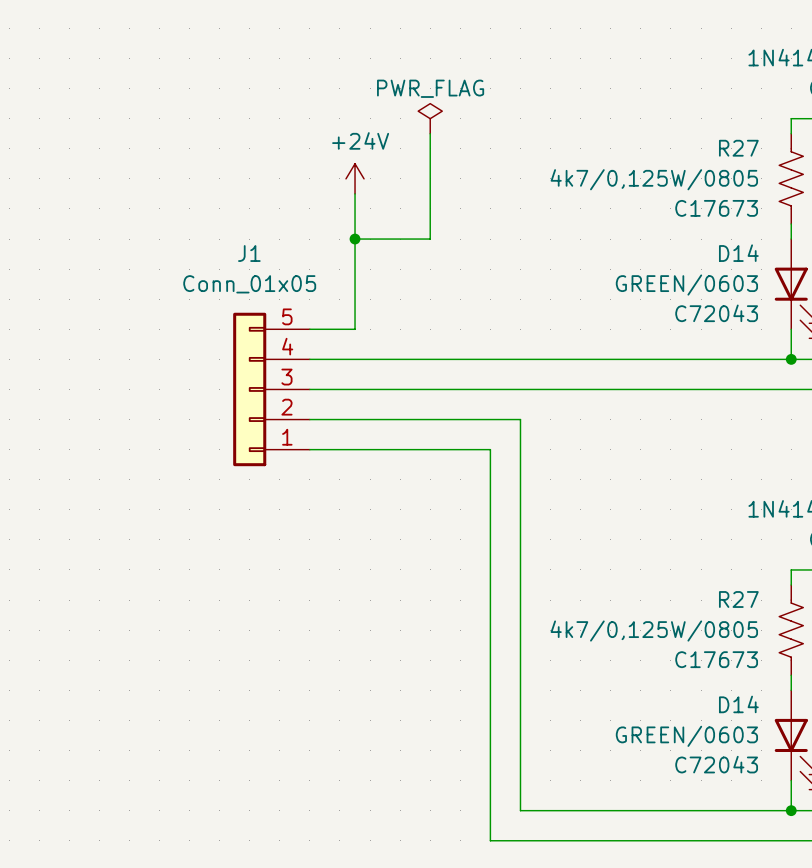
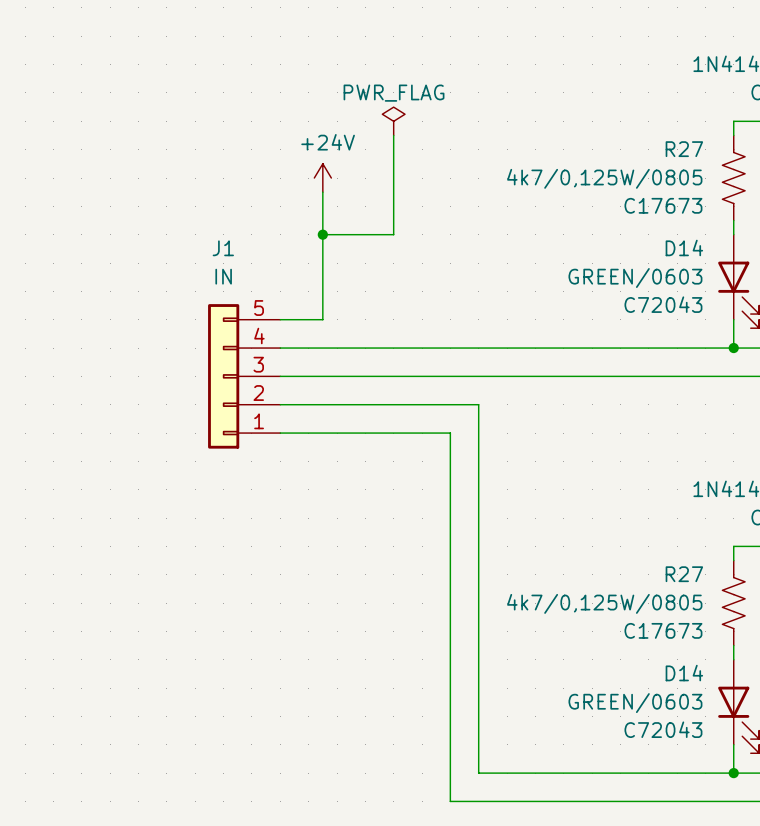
J1 value: Conn_01x05 (249, 284) -> IN (223, 276)

